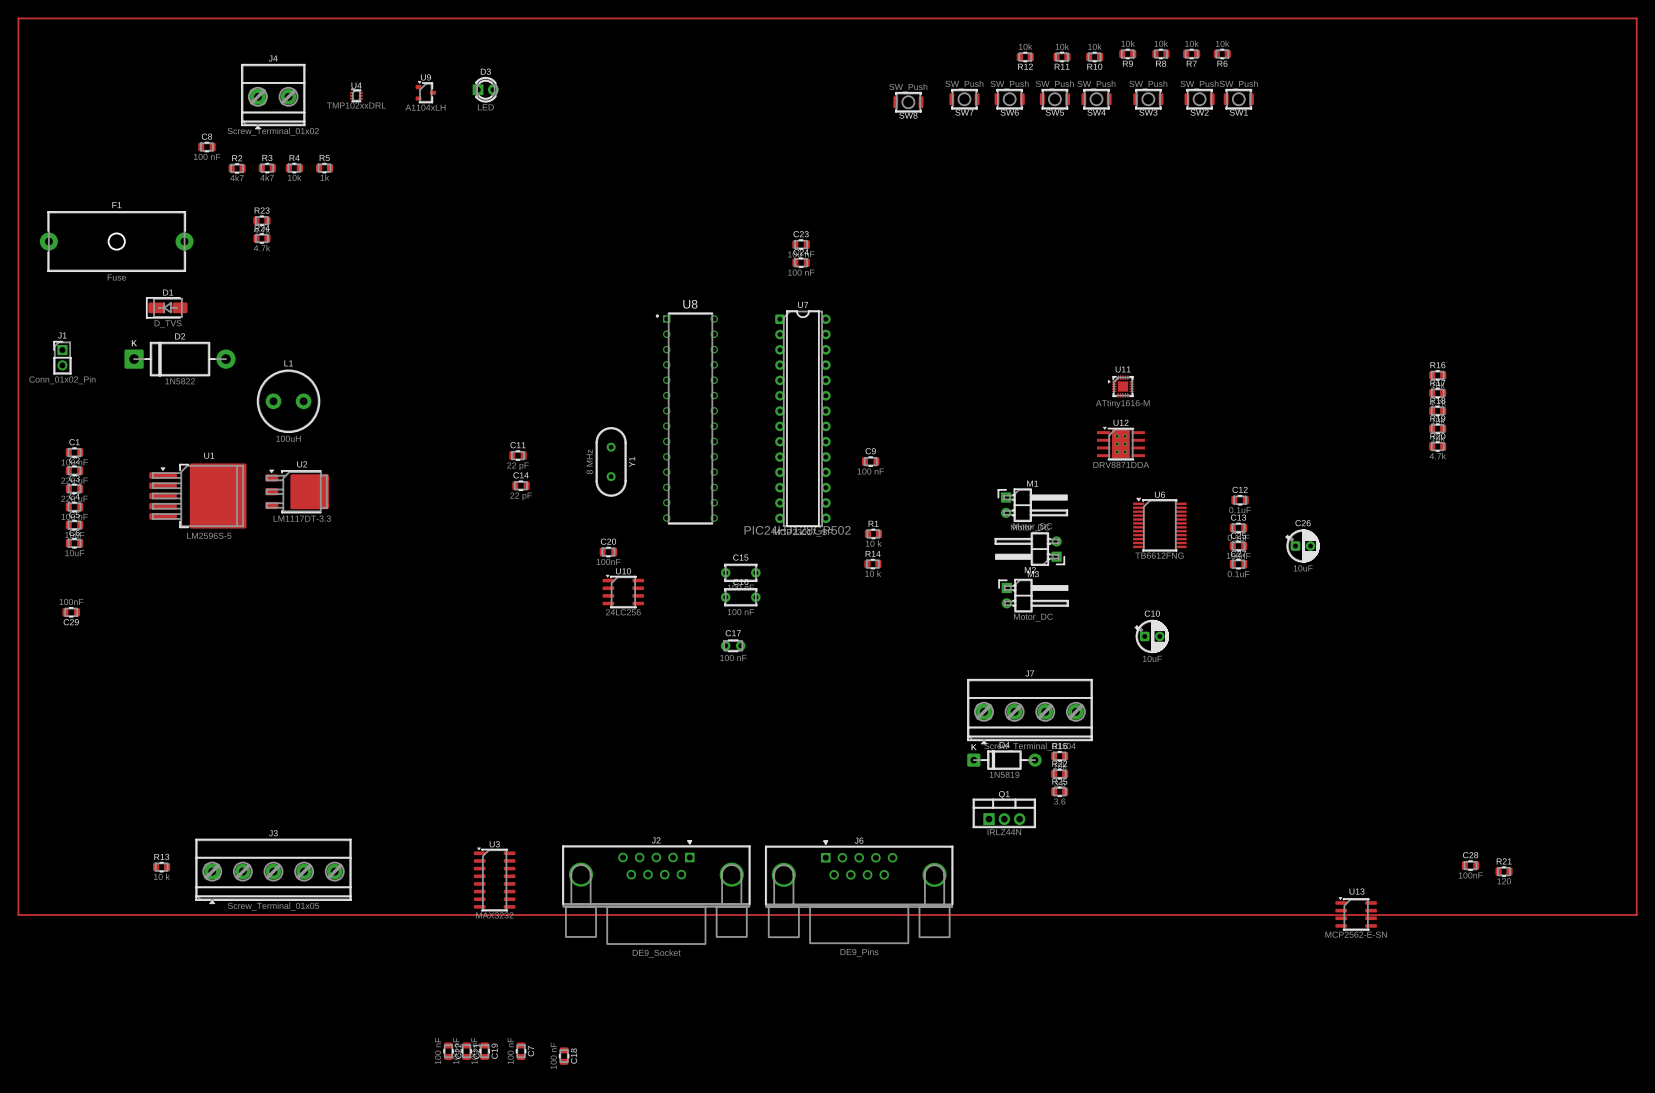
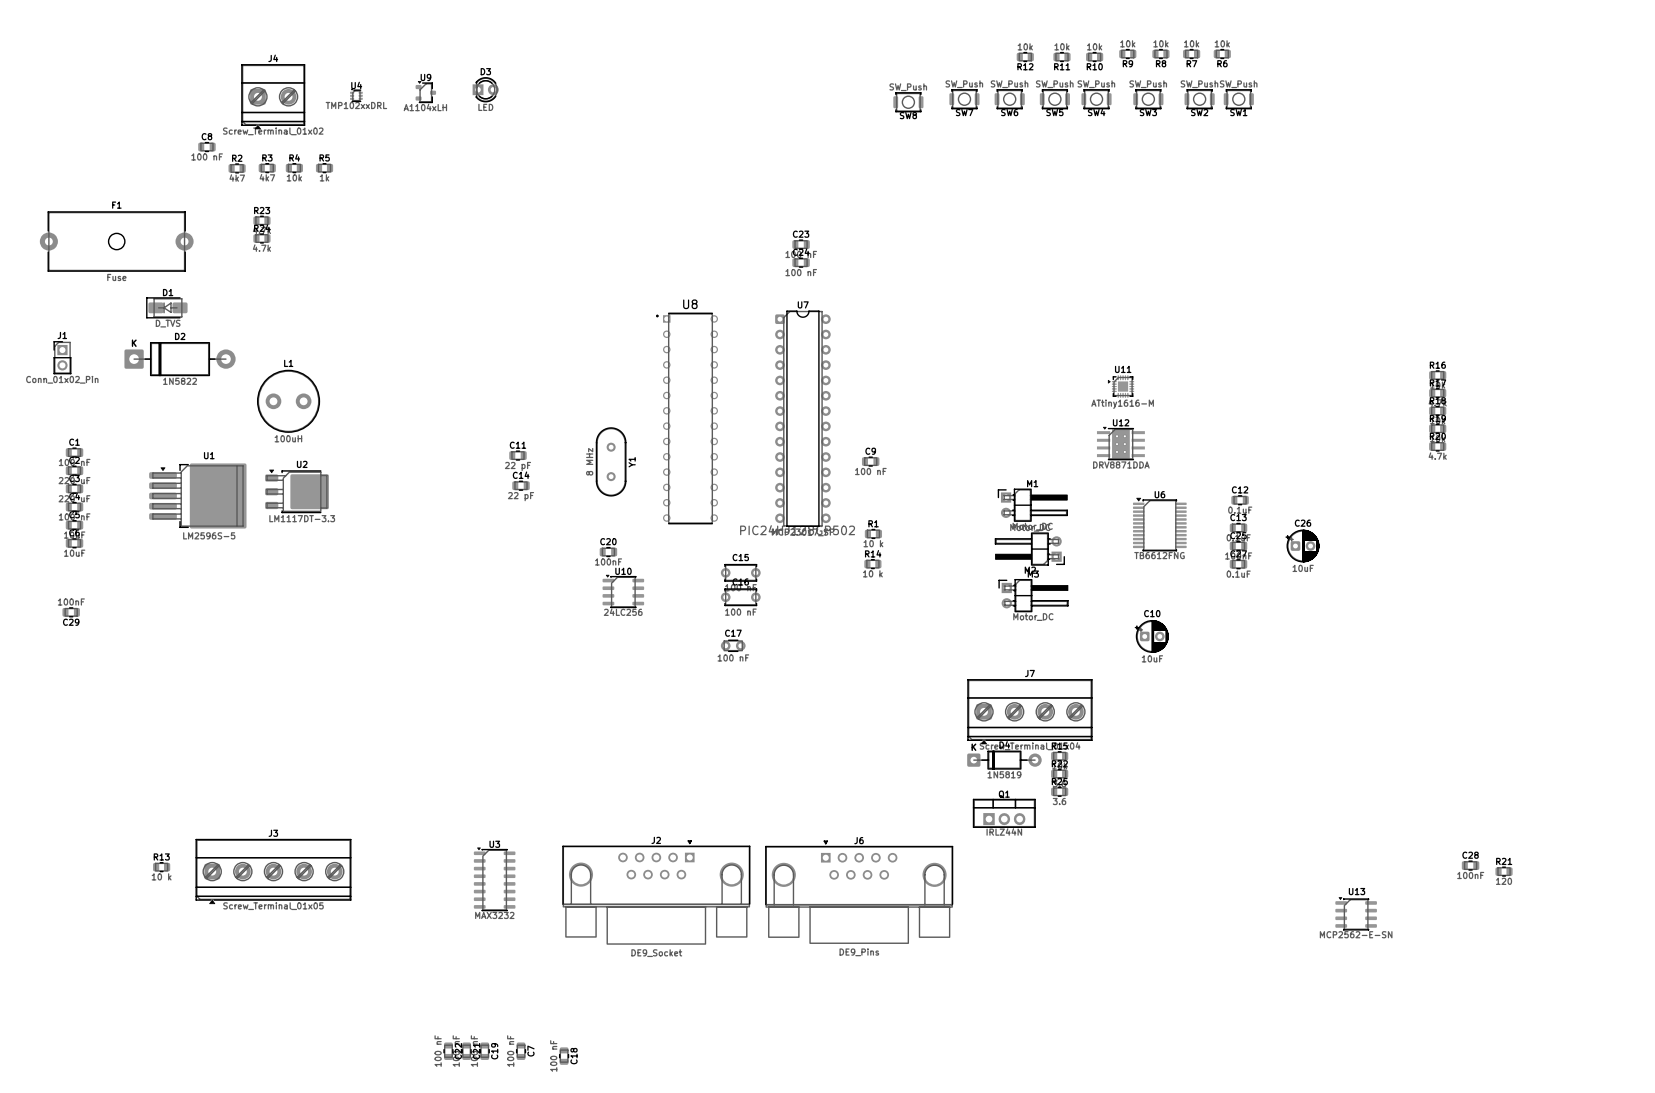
track: (18, 18) (1636, 18) (1636, 915) (18, 915) (18, 18) -> none

